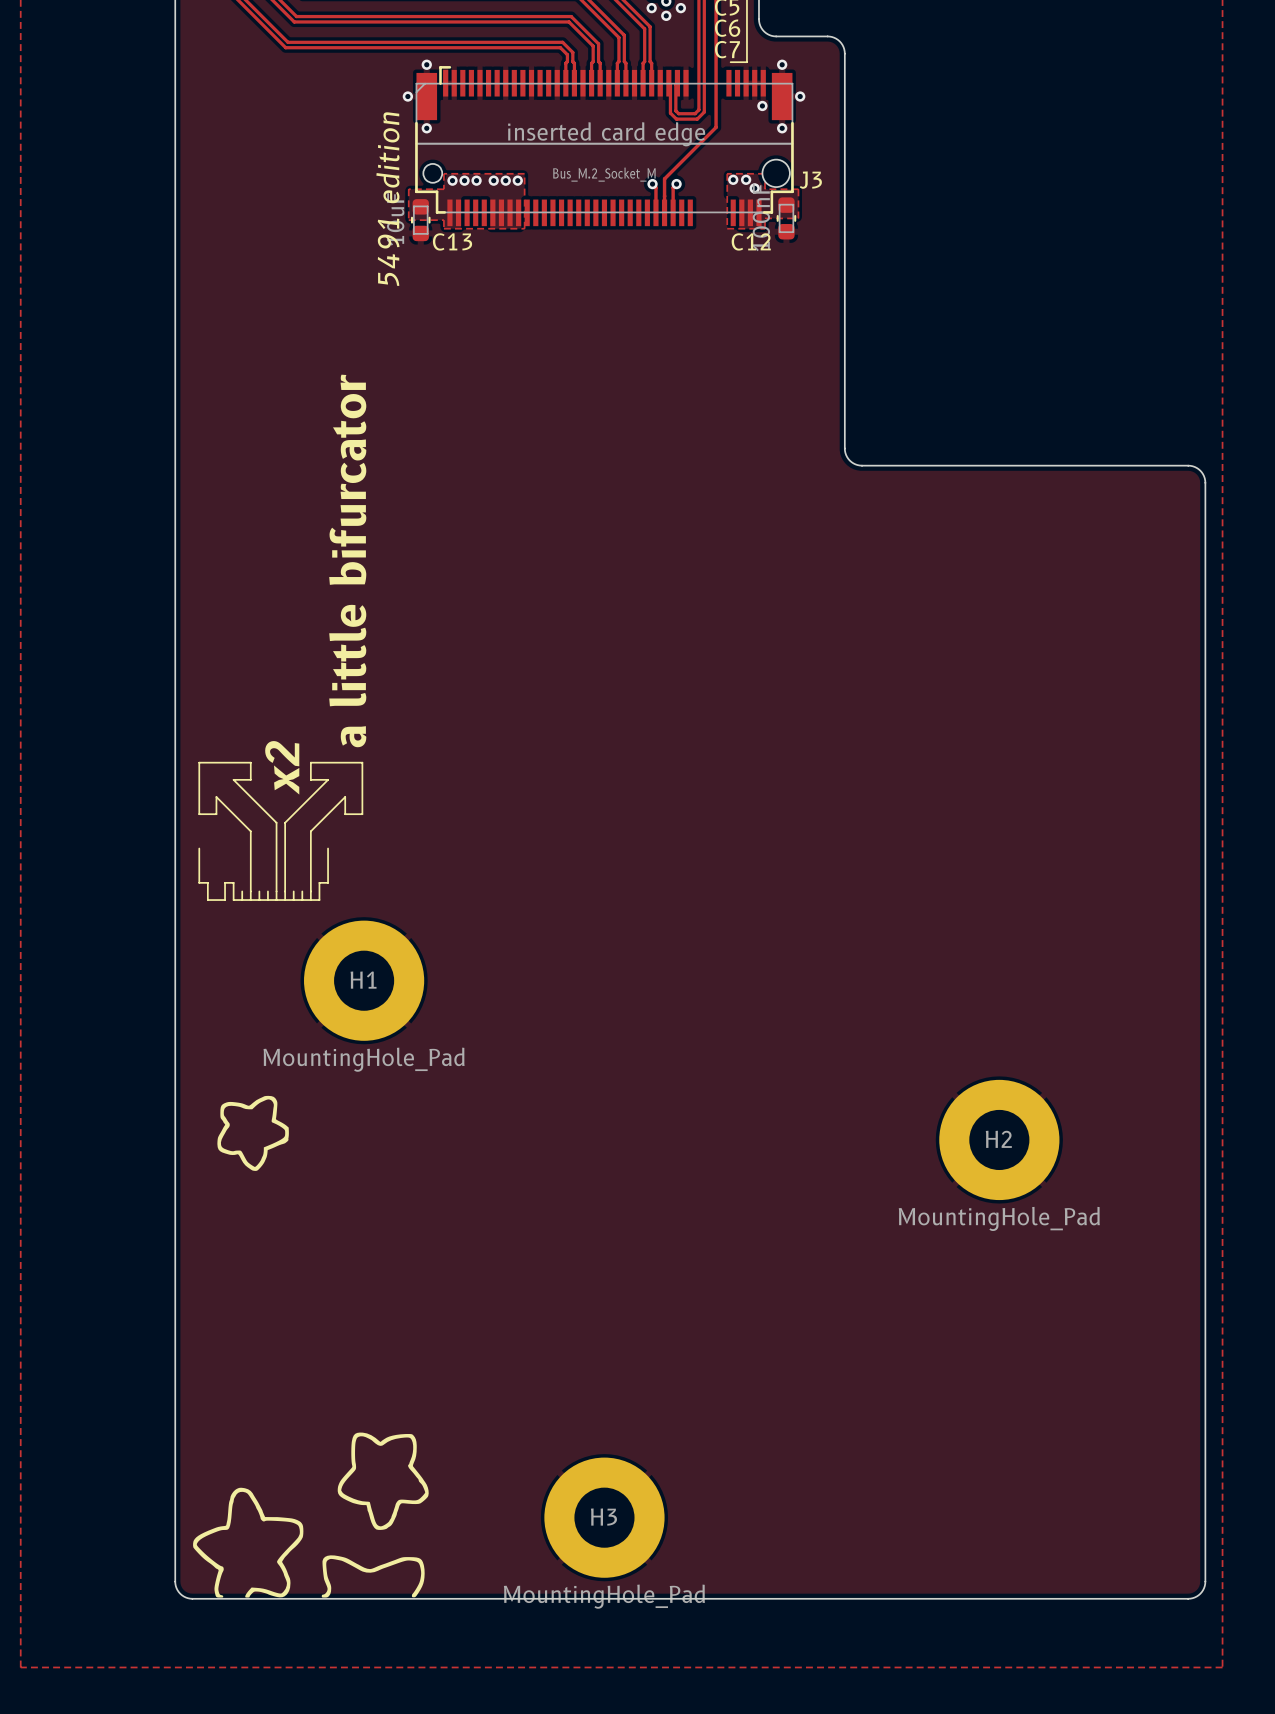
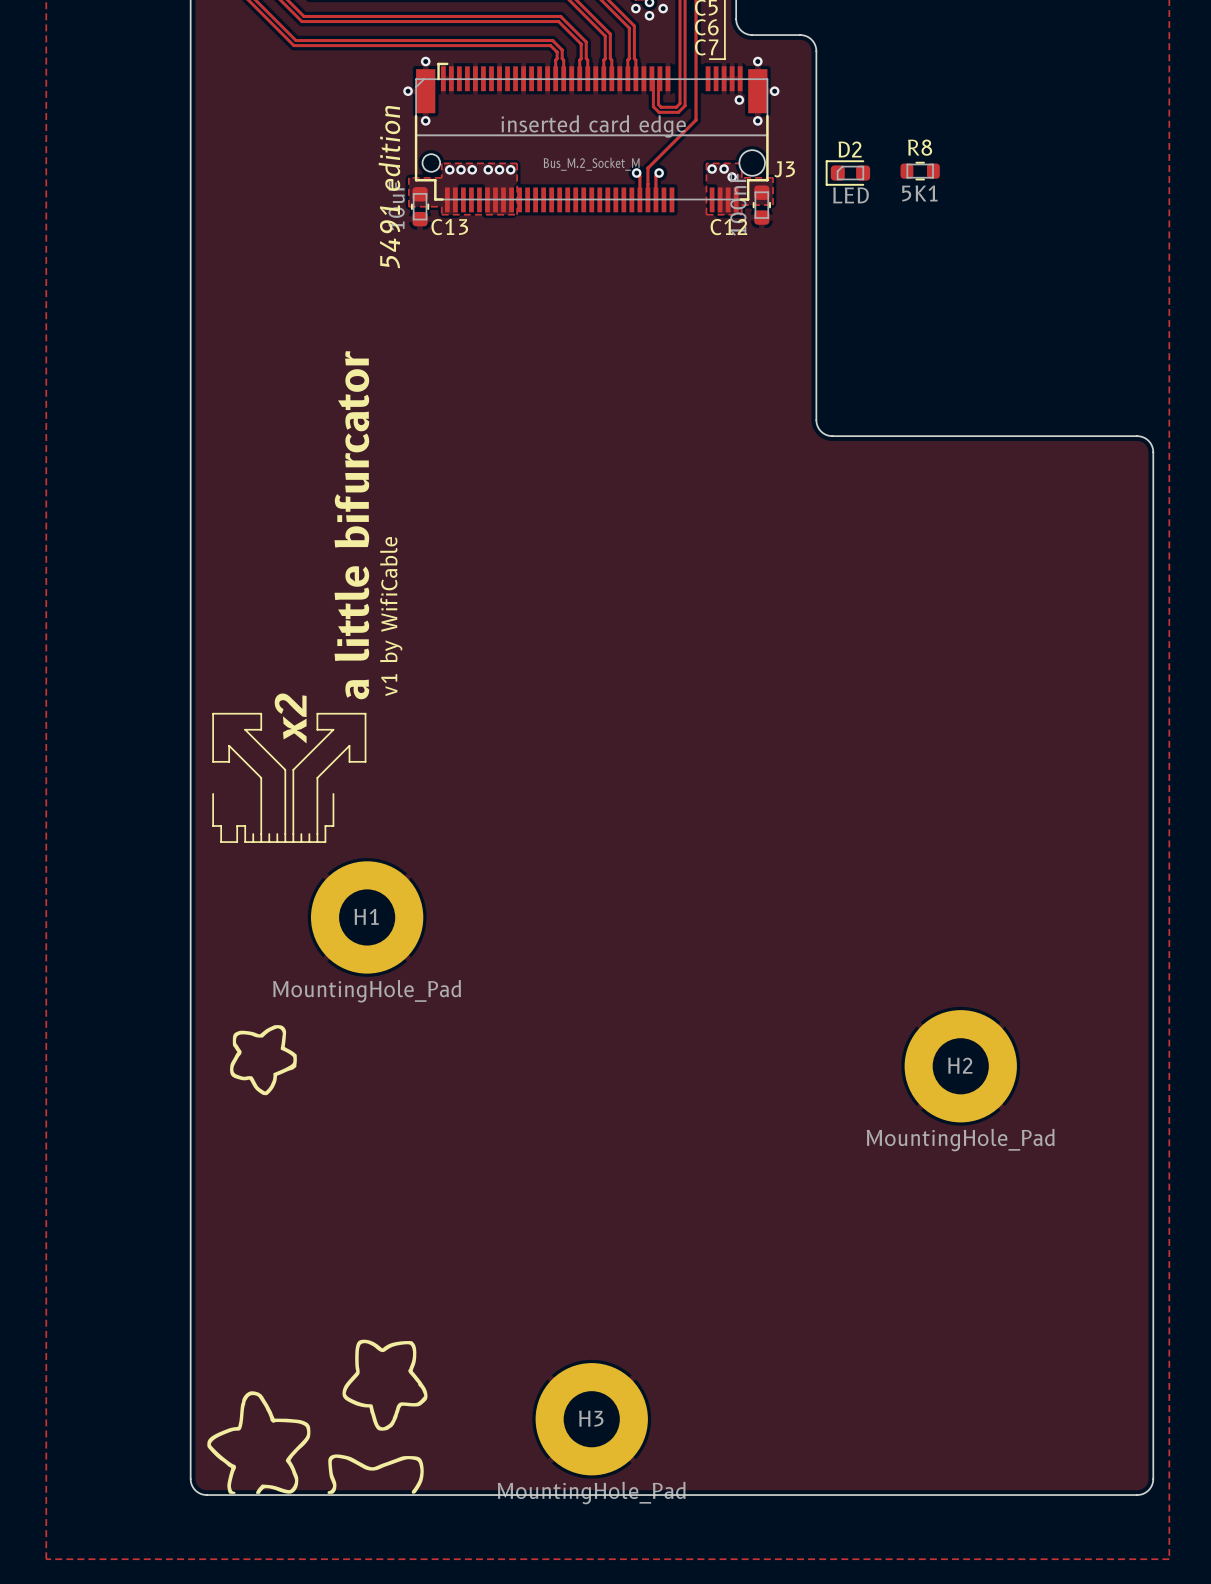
R8: none -> 5K1 (920, 171)
D2: none -> LED (847, 173)
text: none -> v1 by WifiCable (391, 616)

